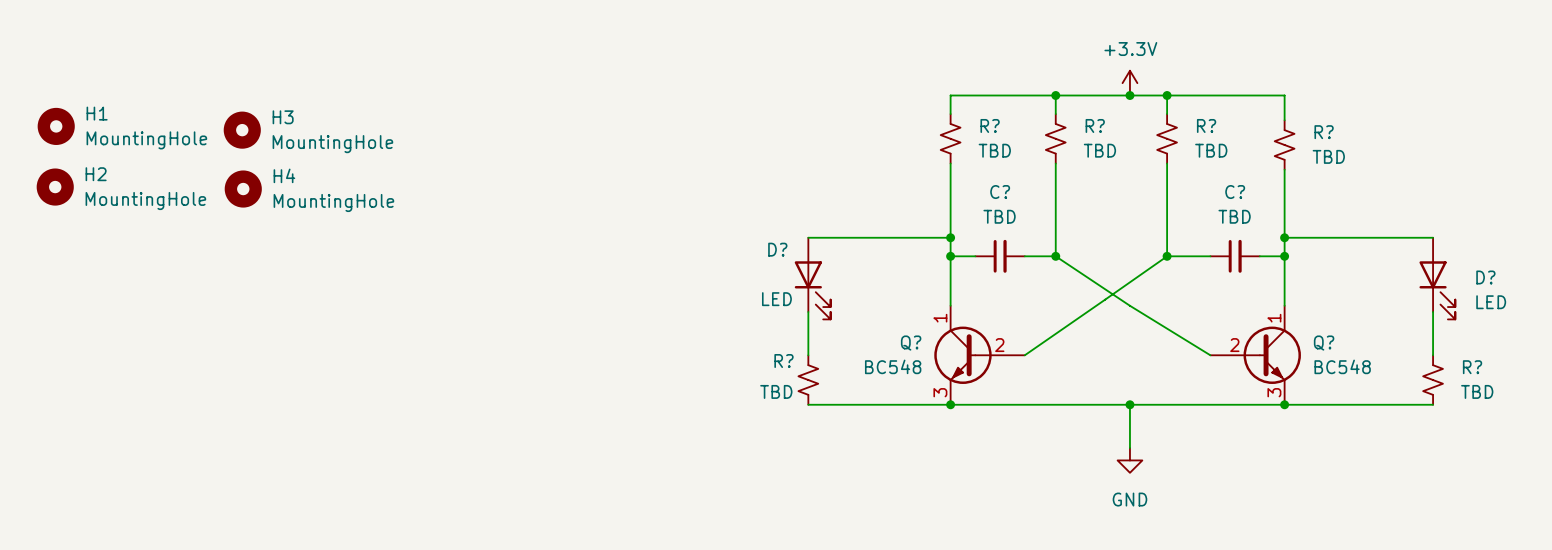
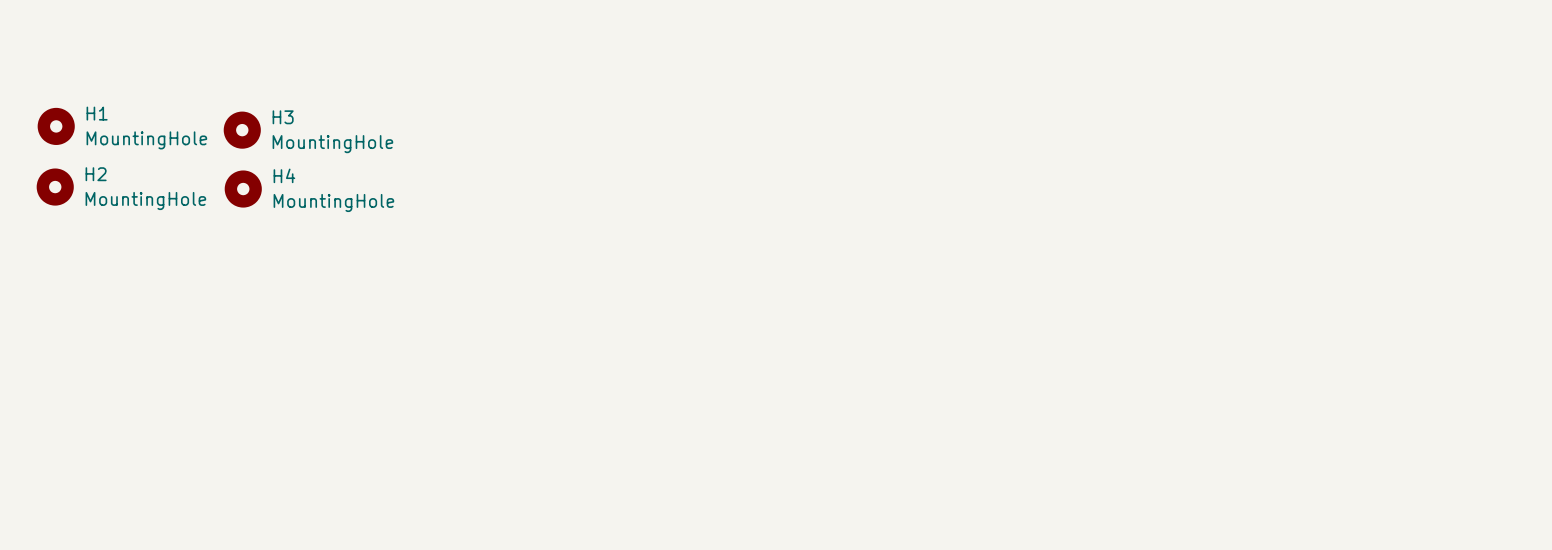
power symbol: +3.3V (1129, 83) -> none
wire: (1055, 95) (1055, 114) -> none
junction: (1055, 95) -> none
junction: (1129, 95) -> none
wire: (1167, 95) (1167, 114) -> none
junction: (1167, 95) -> none
wire: (950, 114) (950, 95) (1284, 95) (1284, 120) -> none
R?: TBD (950, 138) -> none
R?: TBD (1055, 138) -> none
R?: TBD (1167, 138) -> none
R?: TBD (1284, 144) -> none
wire: (950, 163) (950, 305) -> none
wire: (1055, 163) (1055, 256) -> none
wire: (1167, 163) (1167, 256) -> none
wire: (1284, 169) (1284, 305) -> none
wire: (808, 237) (950, 237) -> none
junction: (950, 237) -> none
wire: (1284, 237) (1433, 237) -> none
junction: (1284, 237) -> none
wire: (950, 256) (975, 256) -> none
junction: (950, 256) -> none
C?: TBD (1000, 256) -> none
wire: (1024, 256) (1055, 256) -> none
wire: (1055, 256) (1129, 305) (1210, 355) -> none
junction: (1055, 256) -> none
wire: (1167, 256) (1210, 256) -> none
wire: (1167, 256) (1024, 355) -> none
junction: (1167, 256) -> none
C?: TBD (1235, 256) -> none
wire: (1259, 256) (1284, 256) -> none
junction: (1284, 256) -> none
D?: LED (812, 278) -> none
D?: LED (1437, 278) -> none
wire: (808, 311) (808, 355) -> none
wire: (1433, 311) (1433, 355) -> none
Q?: BC548 (979, 355) -> none
Q?: BC548 (1255, 355) -> none
R?: TBD (808, 380) -> none
R?: TBD (1433, 380) -> none
wire: (808, 404) (1433, 404) -> none
junction: (950, 404) -> none
wire: (1129, 404) (1129, 448) -> none
junction: (1129, 404) -> none
junction: (1284, 404) -> none
power symbol: GND (1129, 460) -> none

